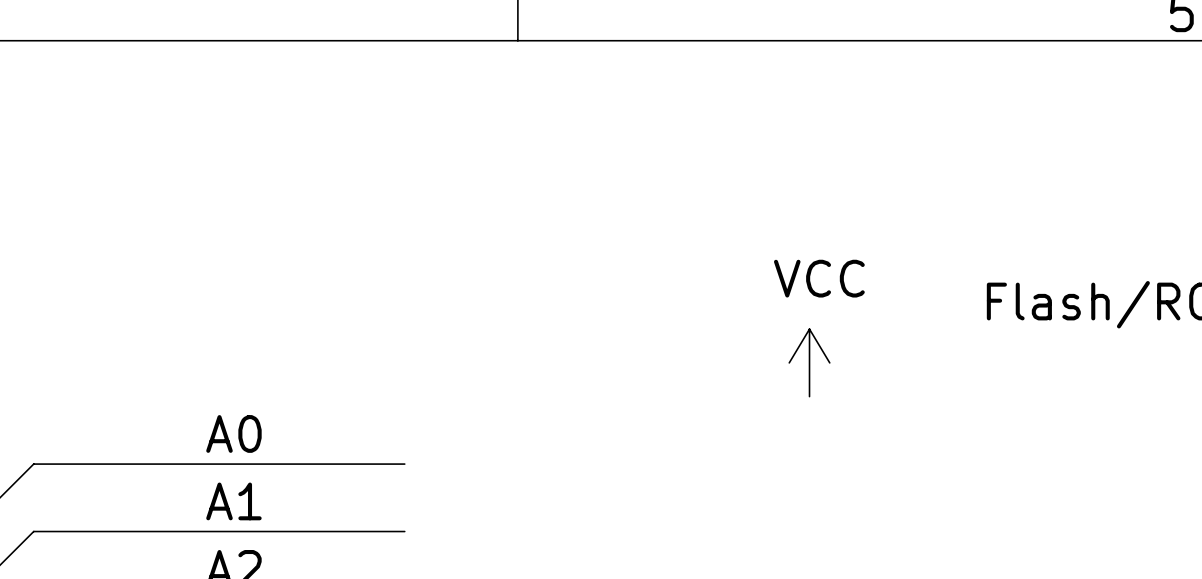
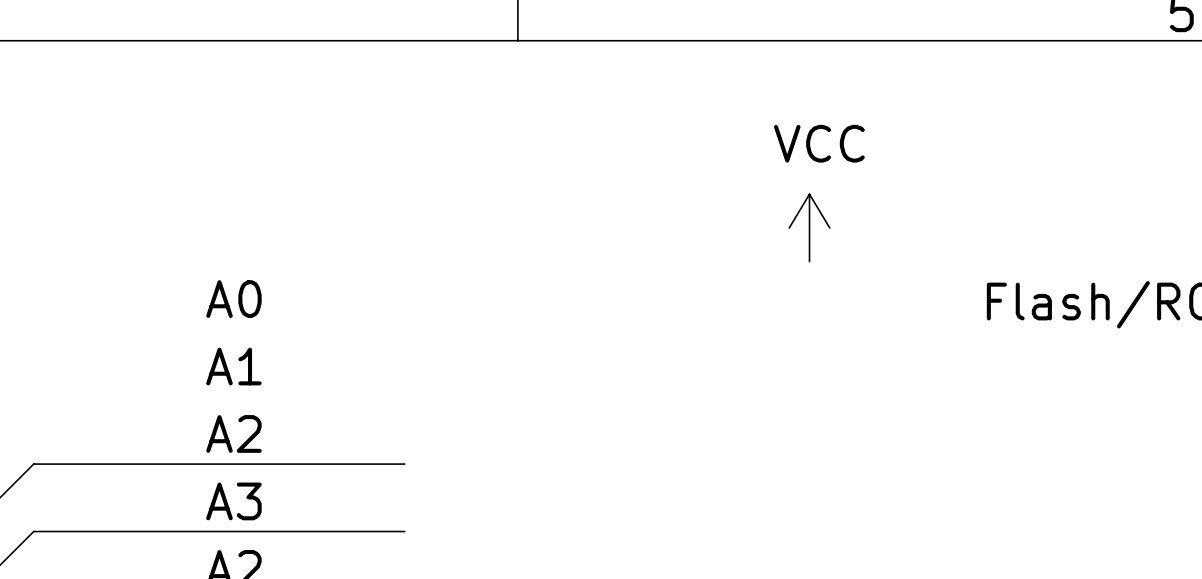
label: none -> A0 (233, 299)
power symbol position: VCC (809, 362) -> VCC (809, 227)
label: none -> A1 (233, 366)
label: A0 (233, 433) -> A2 (233, 433)
label: A1 (233, 501) -> A3 (233, 501)

